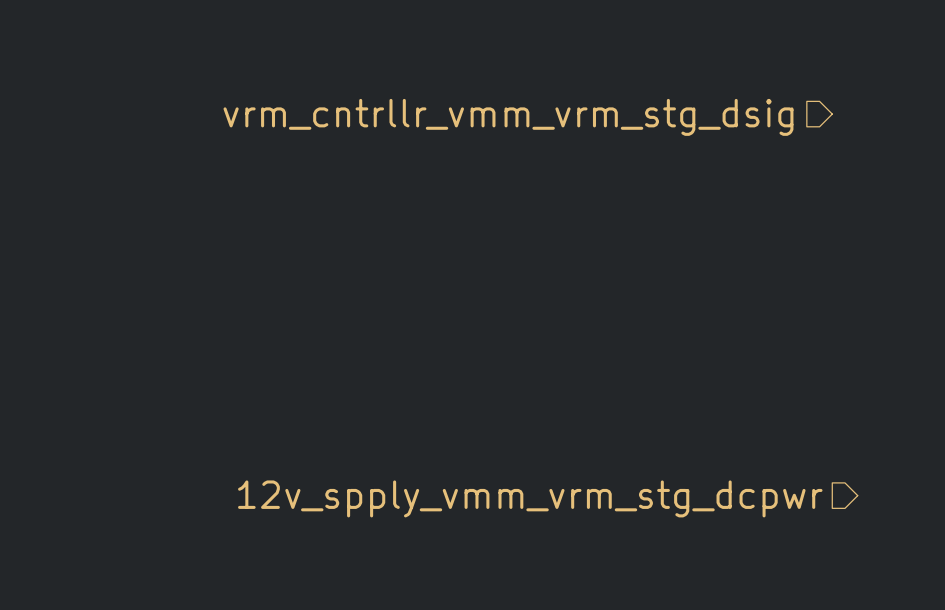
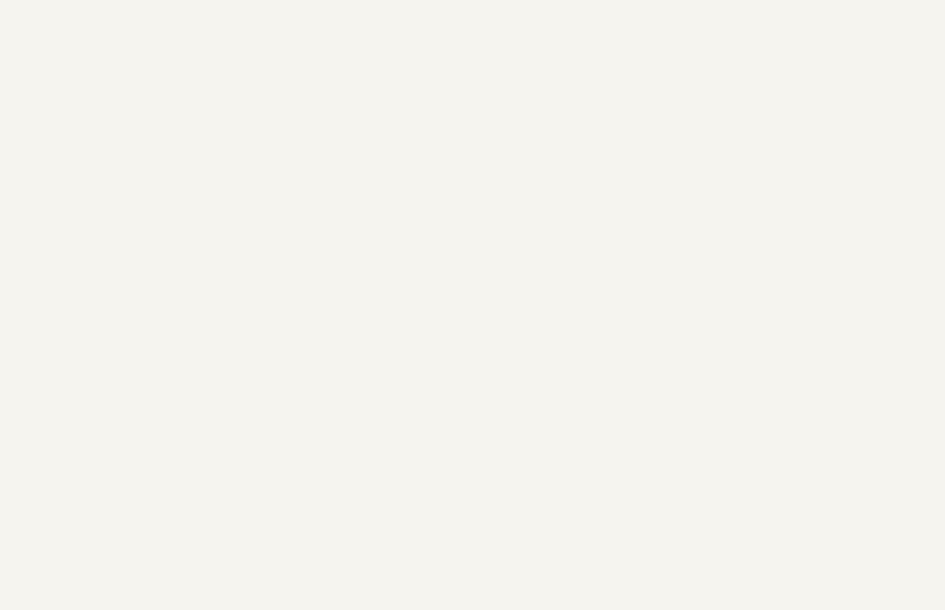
hierarchical label: vrm_cntrllr_vmm_vrm_stg_dsig (508, 117) -> none
hierarchical label: 12v_spply_vmm_vrm_stg_dcpwr (530, 498) -> none

